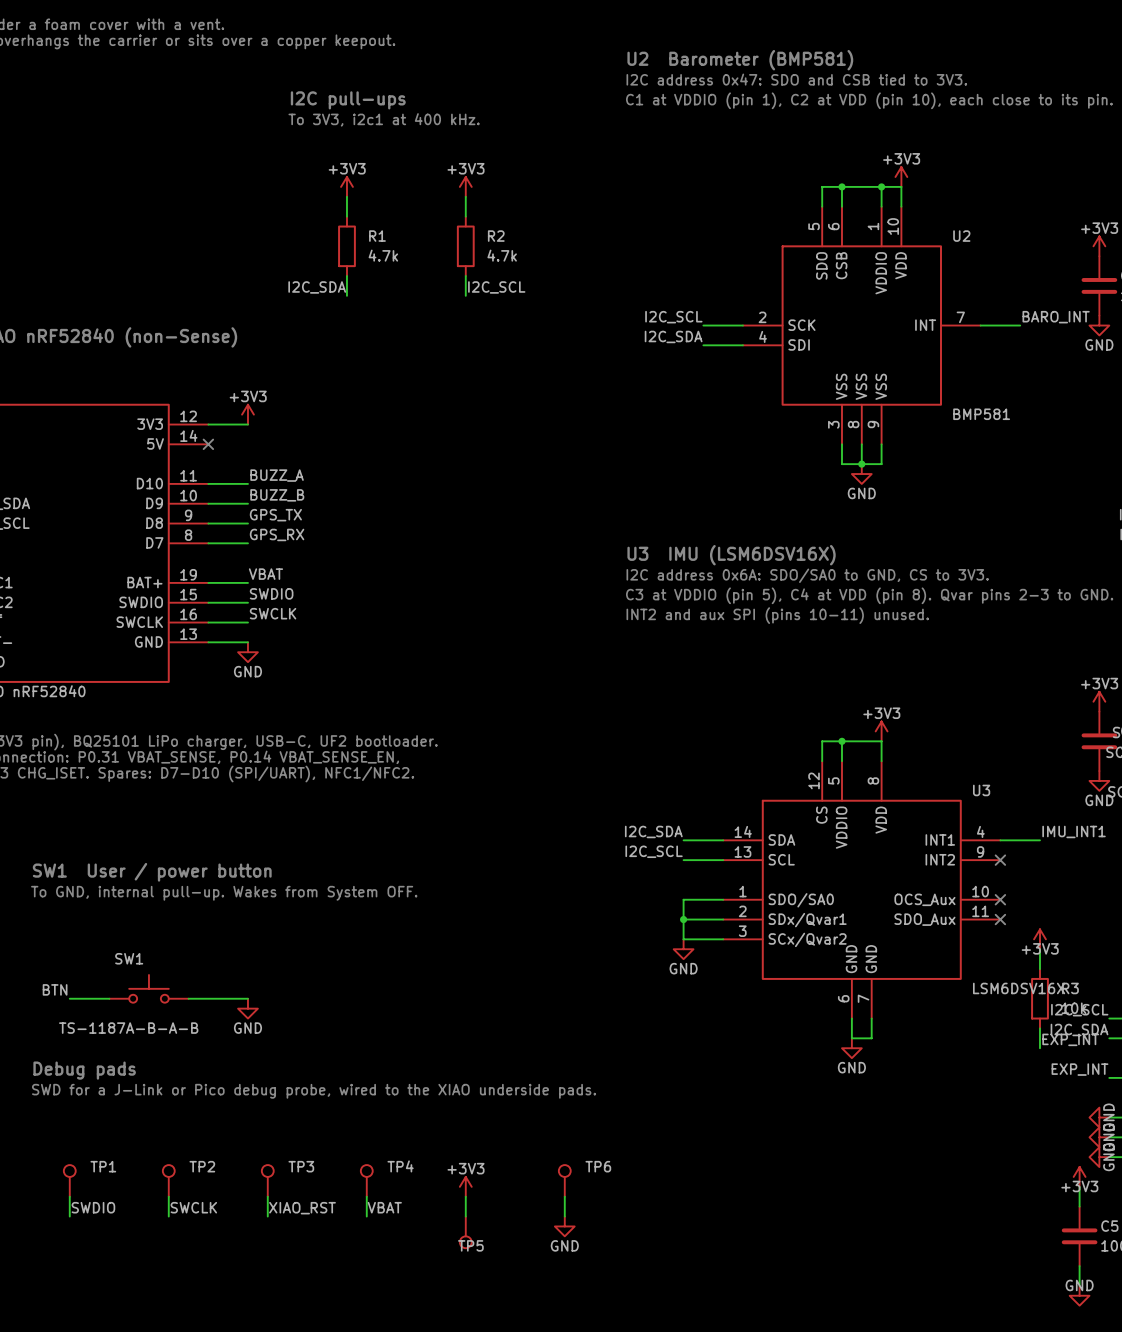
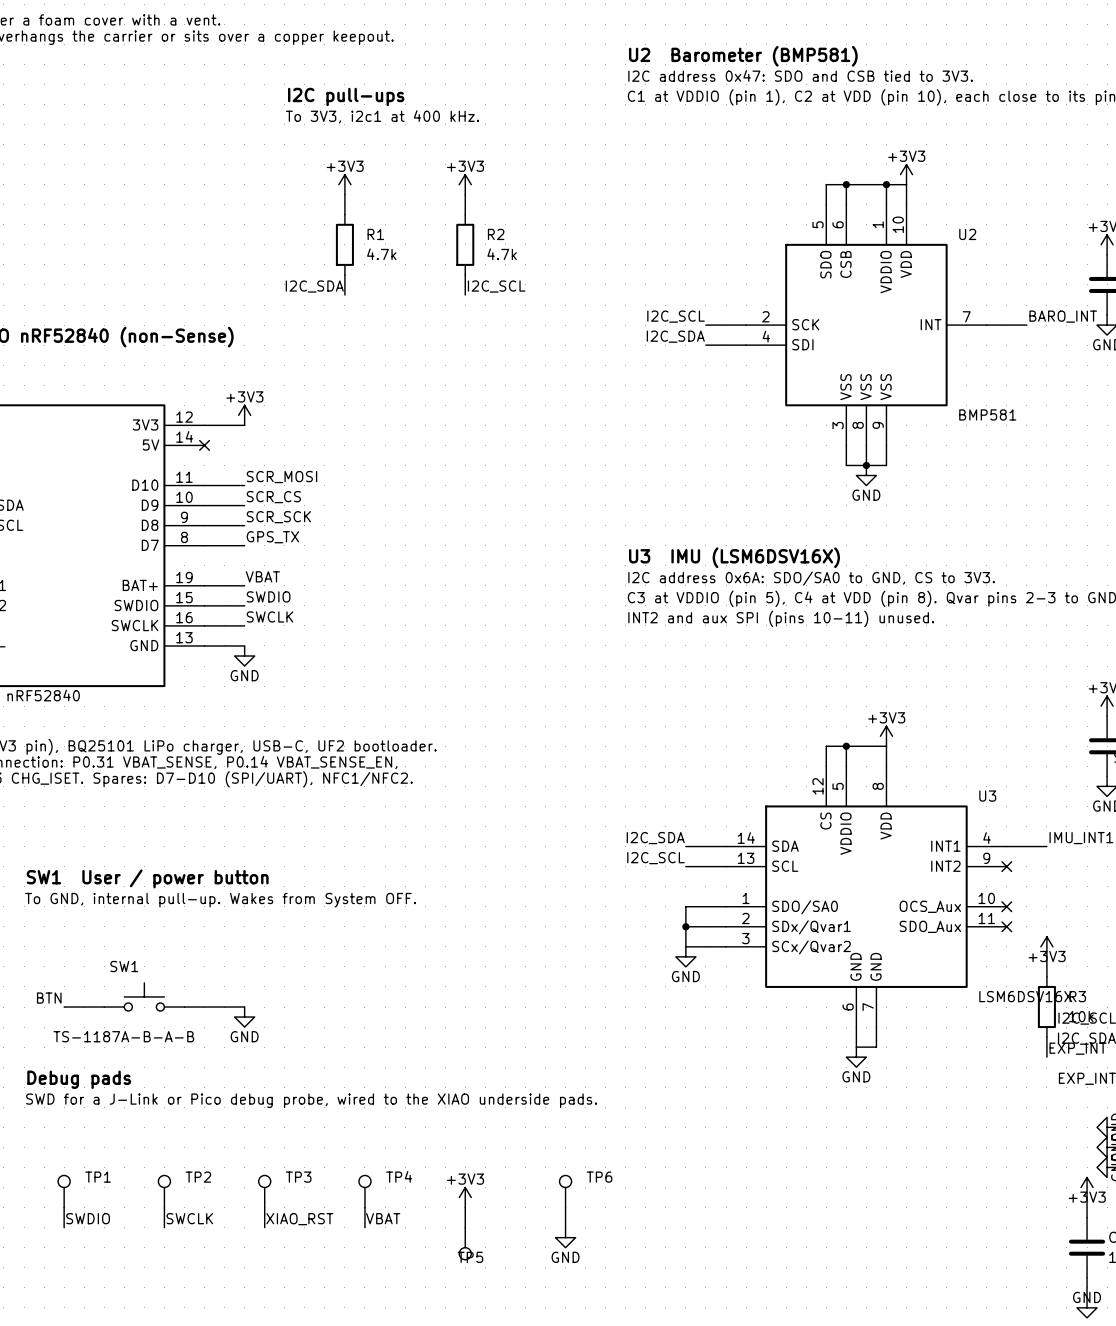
label: BUZZ_A (277, 475) -> SCR_MOSI (281, 477)
label: BUZZ_B (277, 495) -> SCR_CS (273, 497)
label: GPS_TX (275, 515) -> SCR_SCK (278, 517)
label: GPS_RX (277, 534) -> GPS_TX (272, 537)

